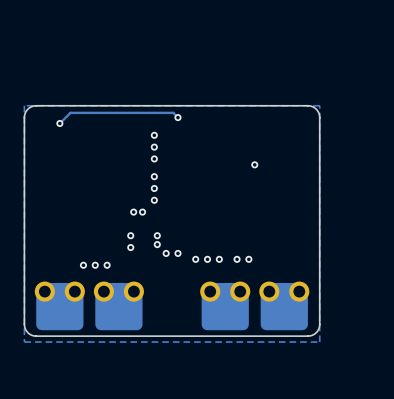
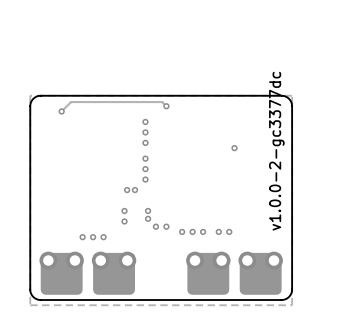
text: none -> v1.0.0-2-gc3377dc (276, 151)

